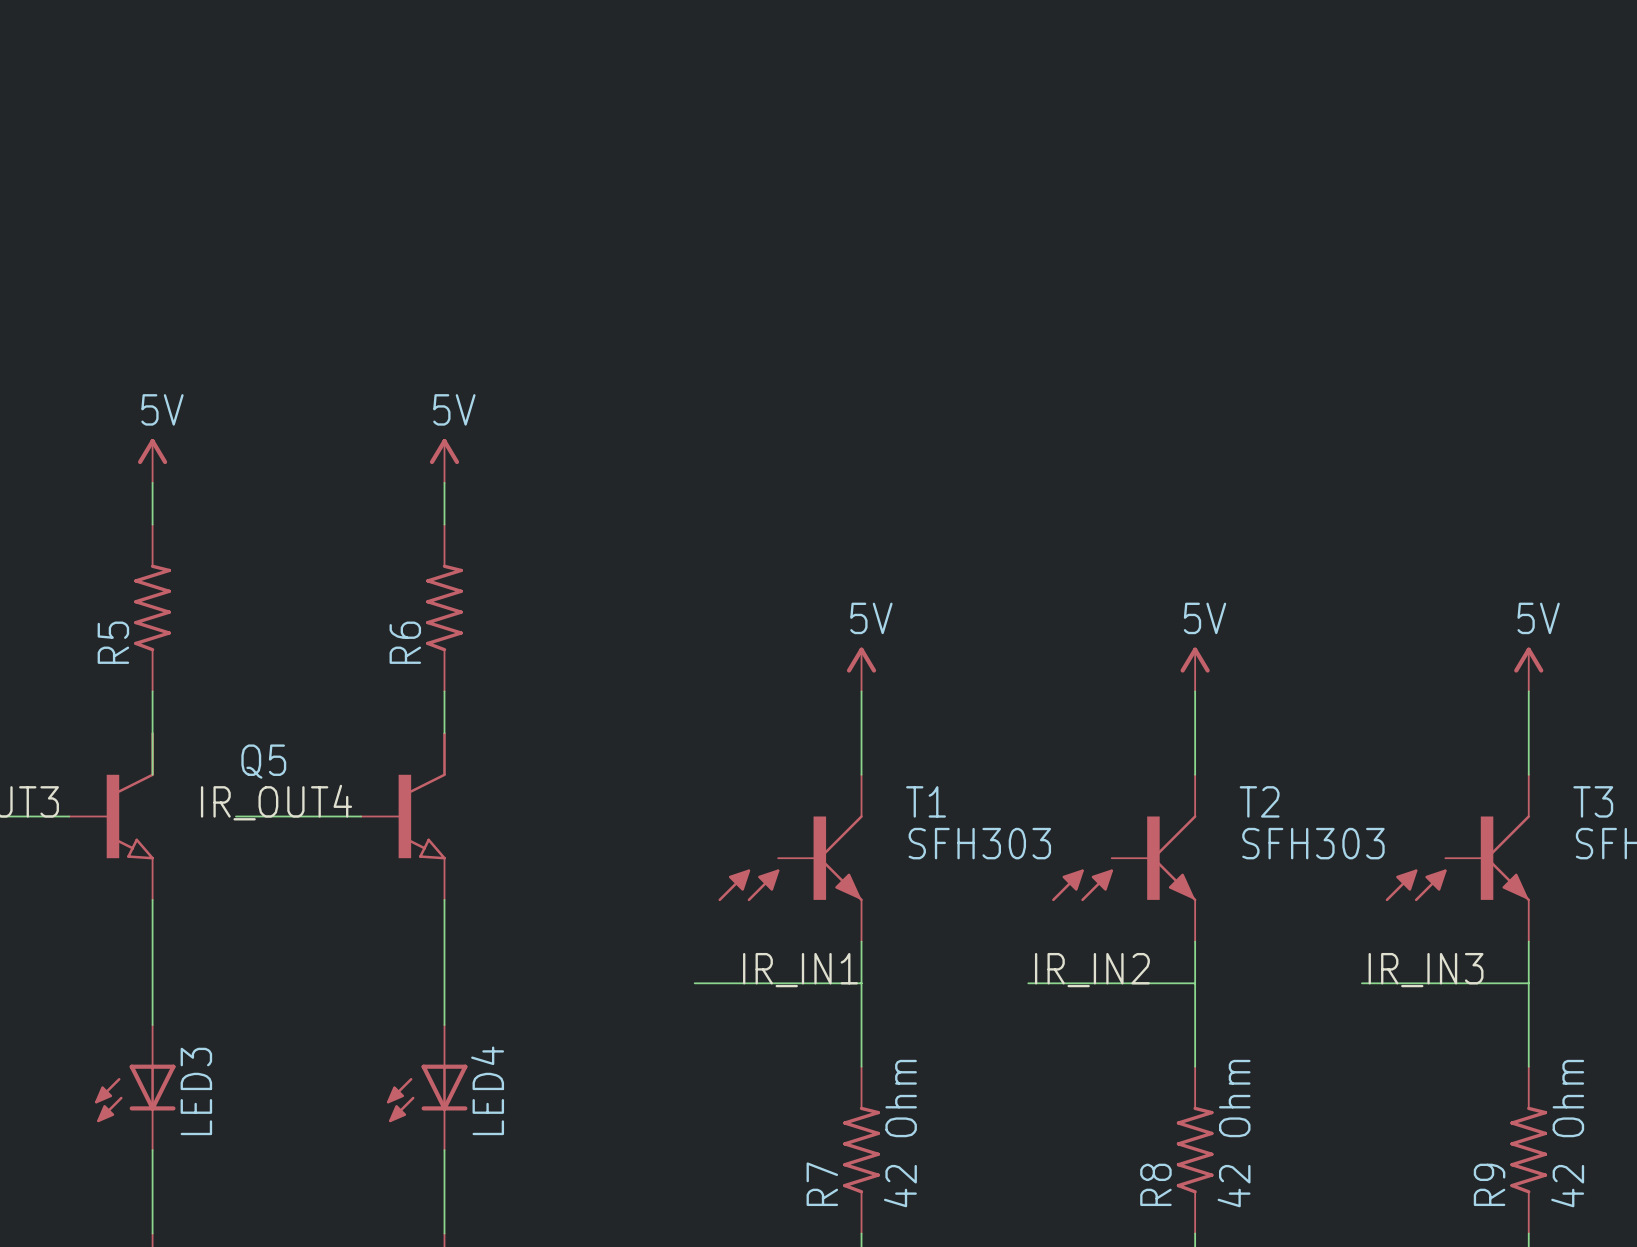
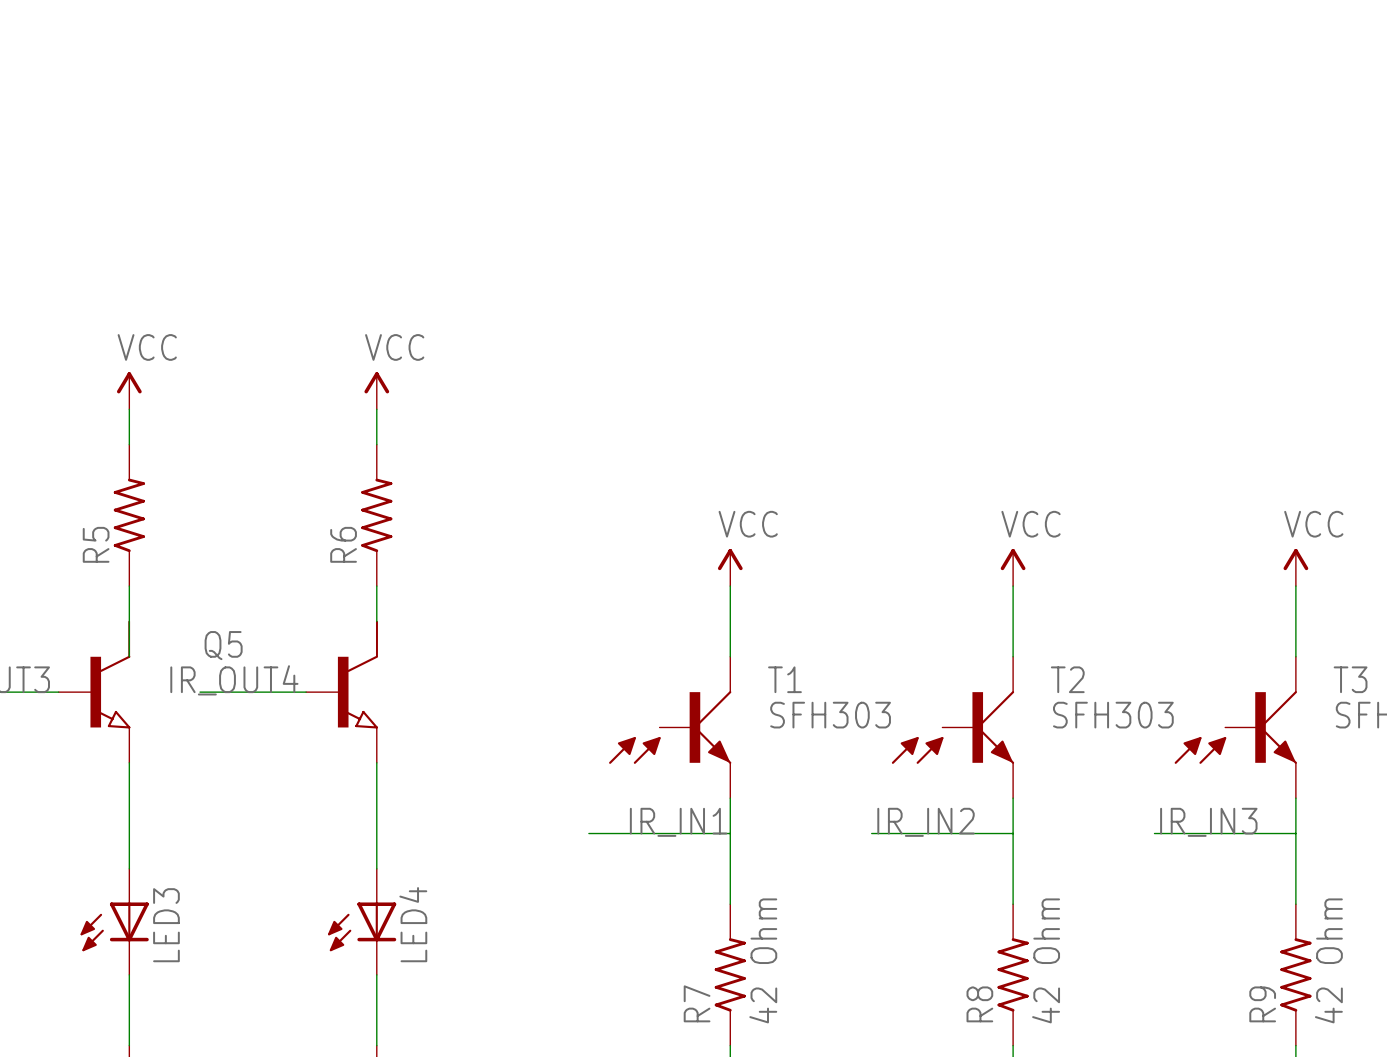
power symbol: 5V (152, 460) -> VCC (129, 390)
power symbol: 5V (444, 460) -> VCC (376, 390)
power symbol: 5V (861, 669) -> VCC (730, 567)
power symbol: 5V (1195, 669) -> VCC (1013, 567)
power symbol: 5V (1528, 669) -> VCC (1295, 567)

